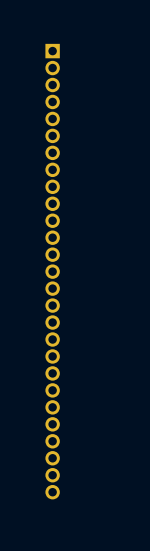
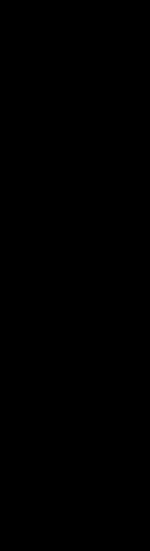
part: (52, 271) -> none

